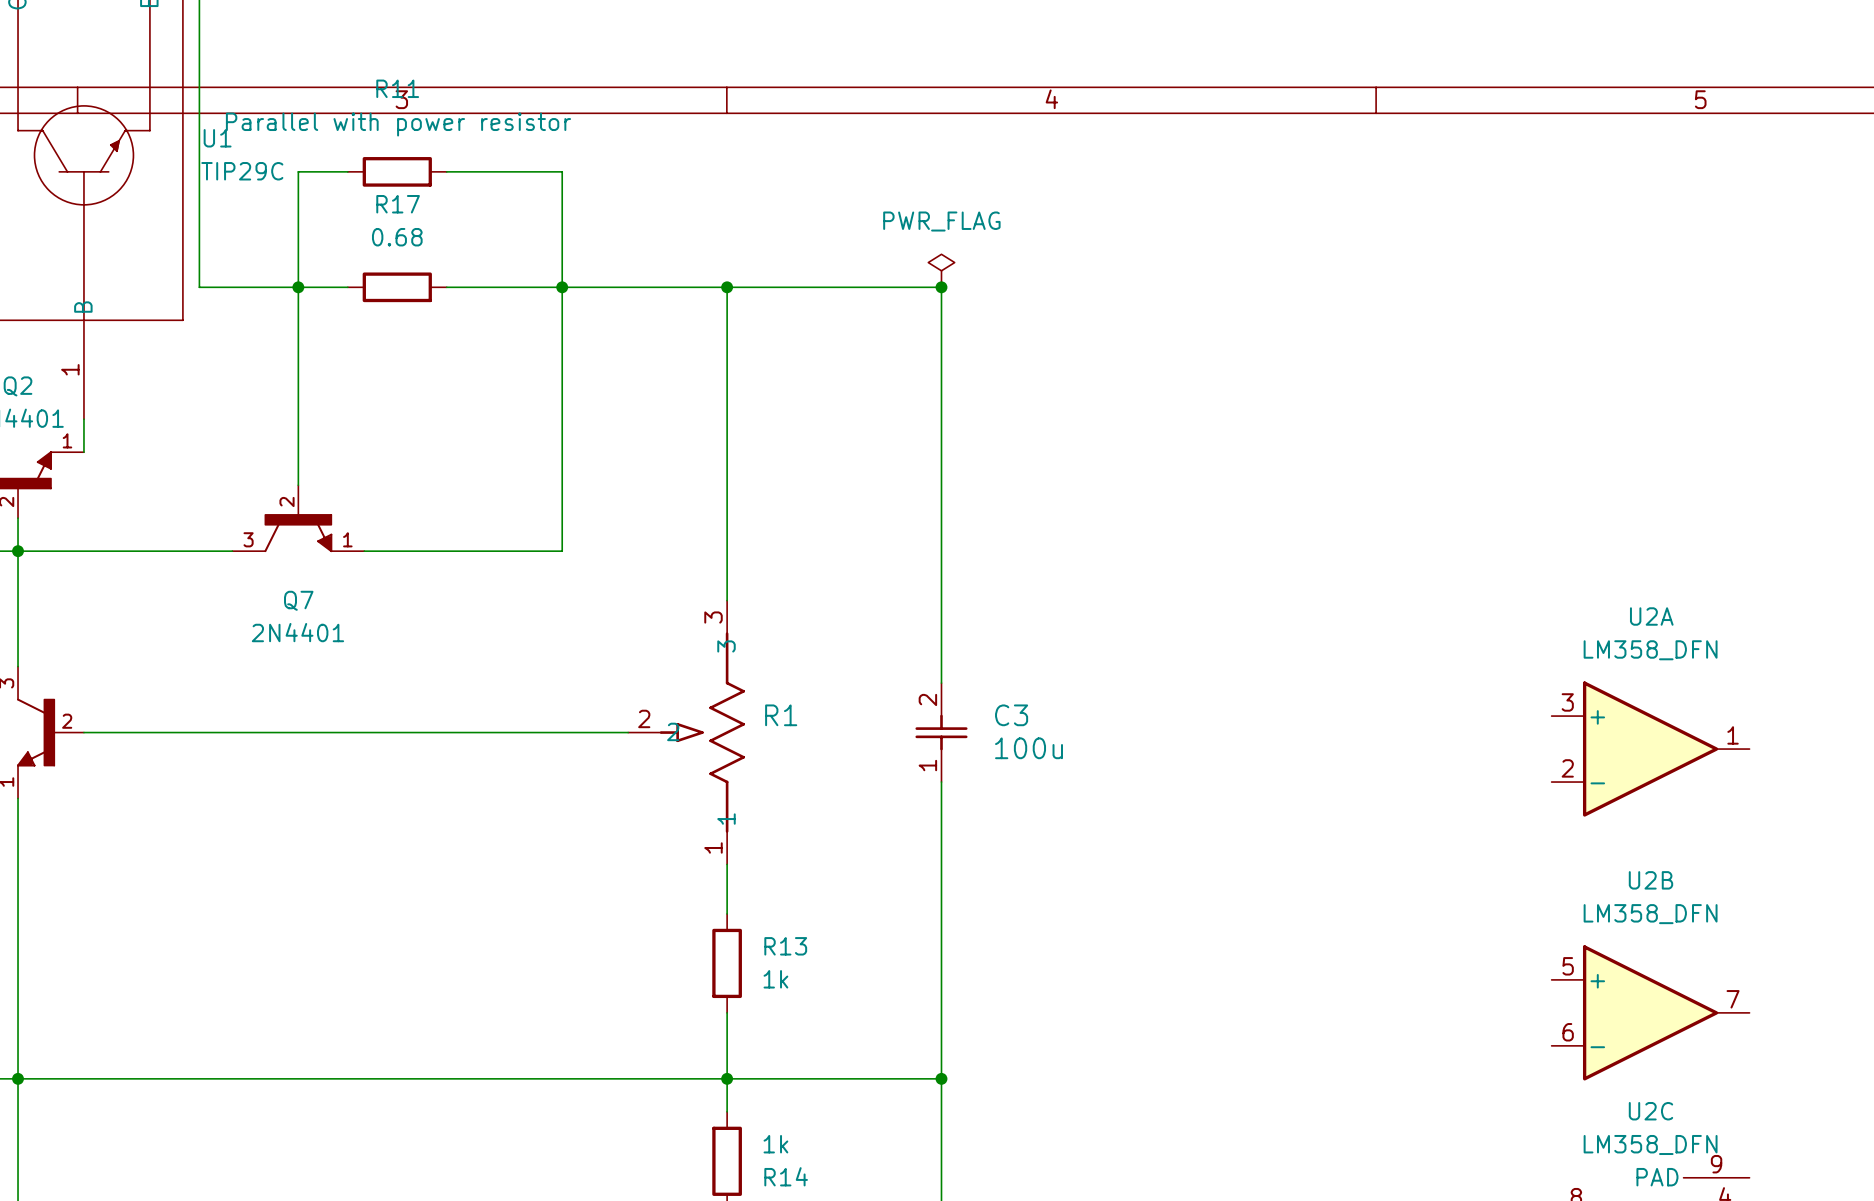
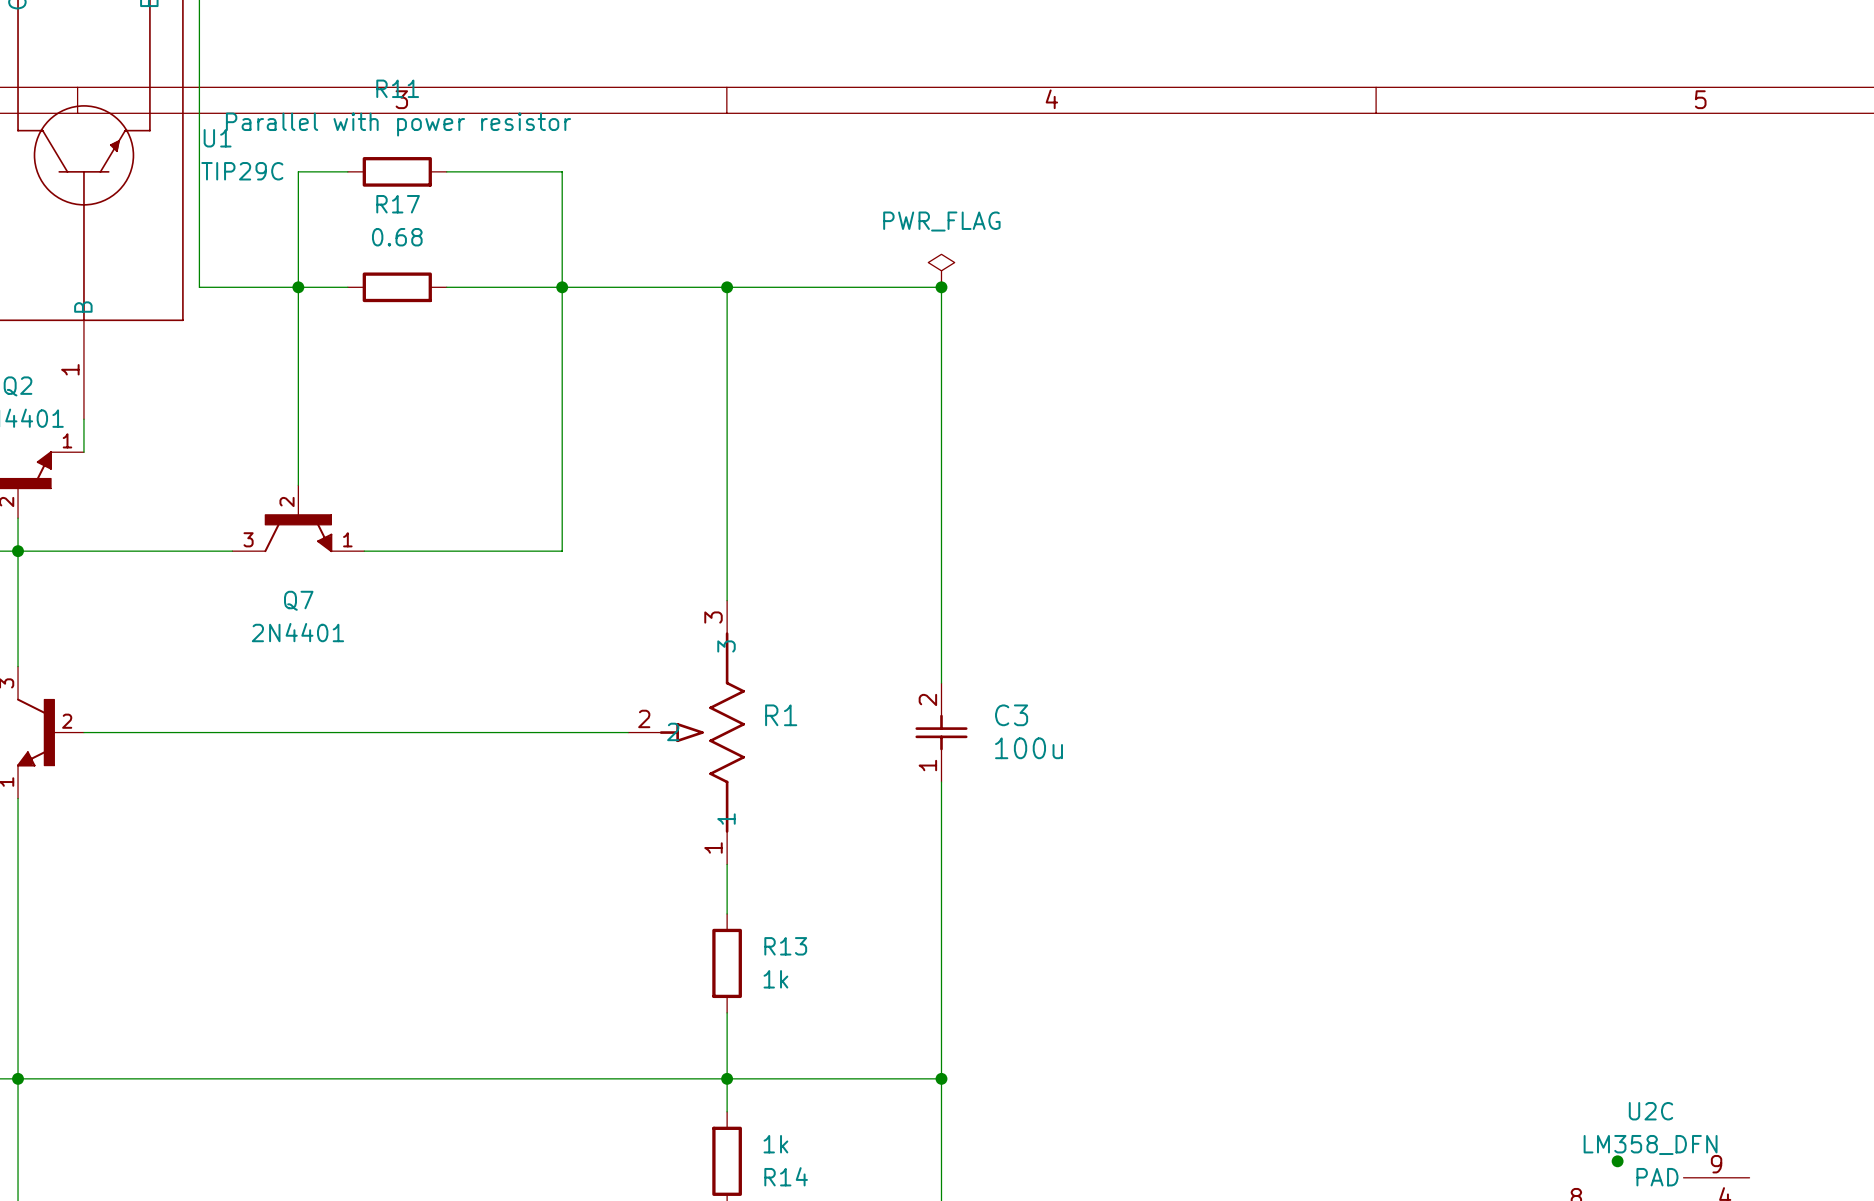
U2A: LM358_DFN (1650, 749) -> none
U2B: LM358_DFN (1650, 1012) -> none
junction: none -> (1617, 1161)

